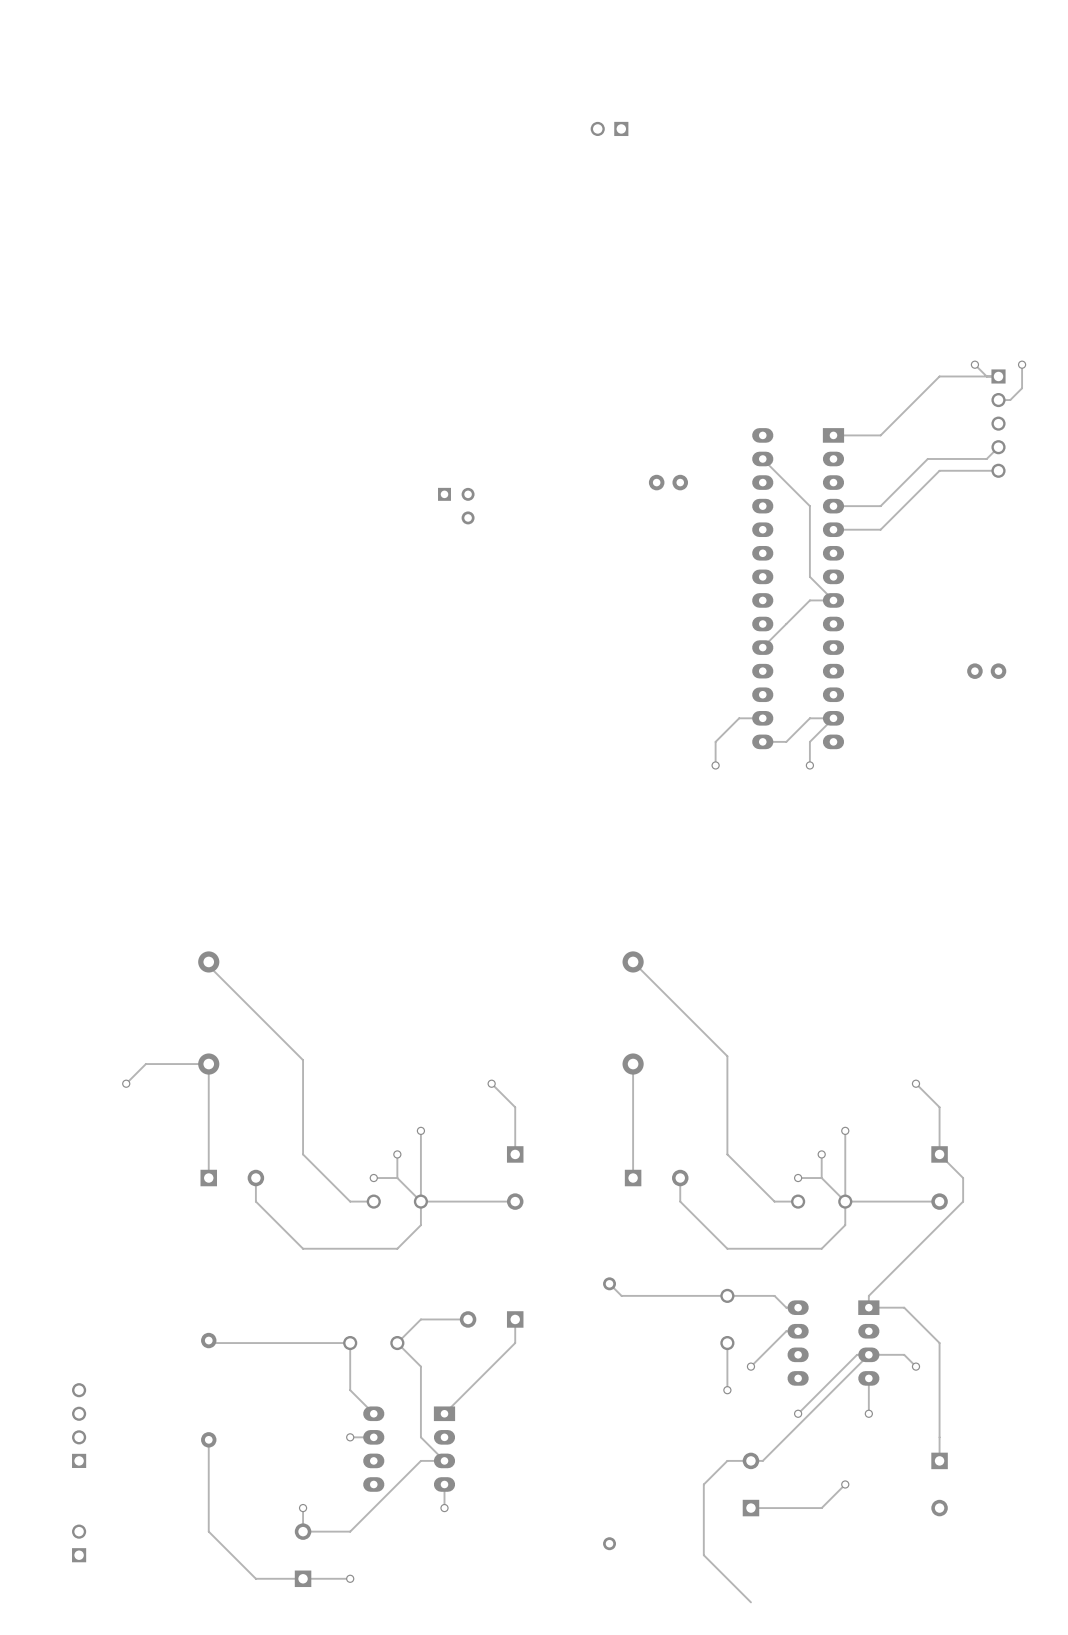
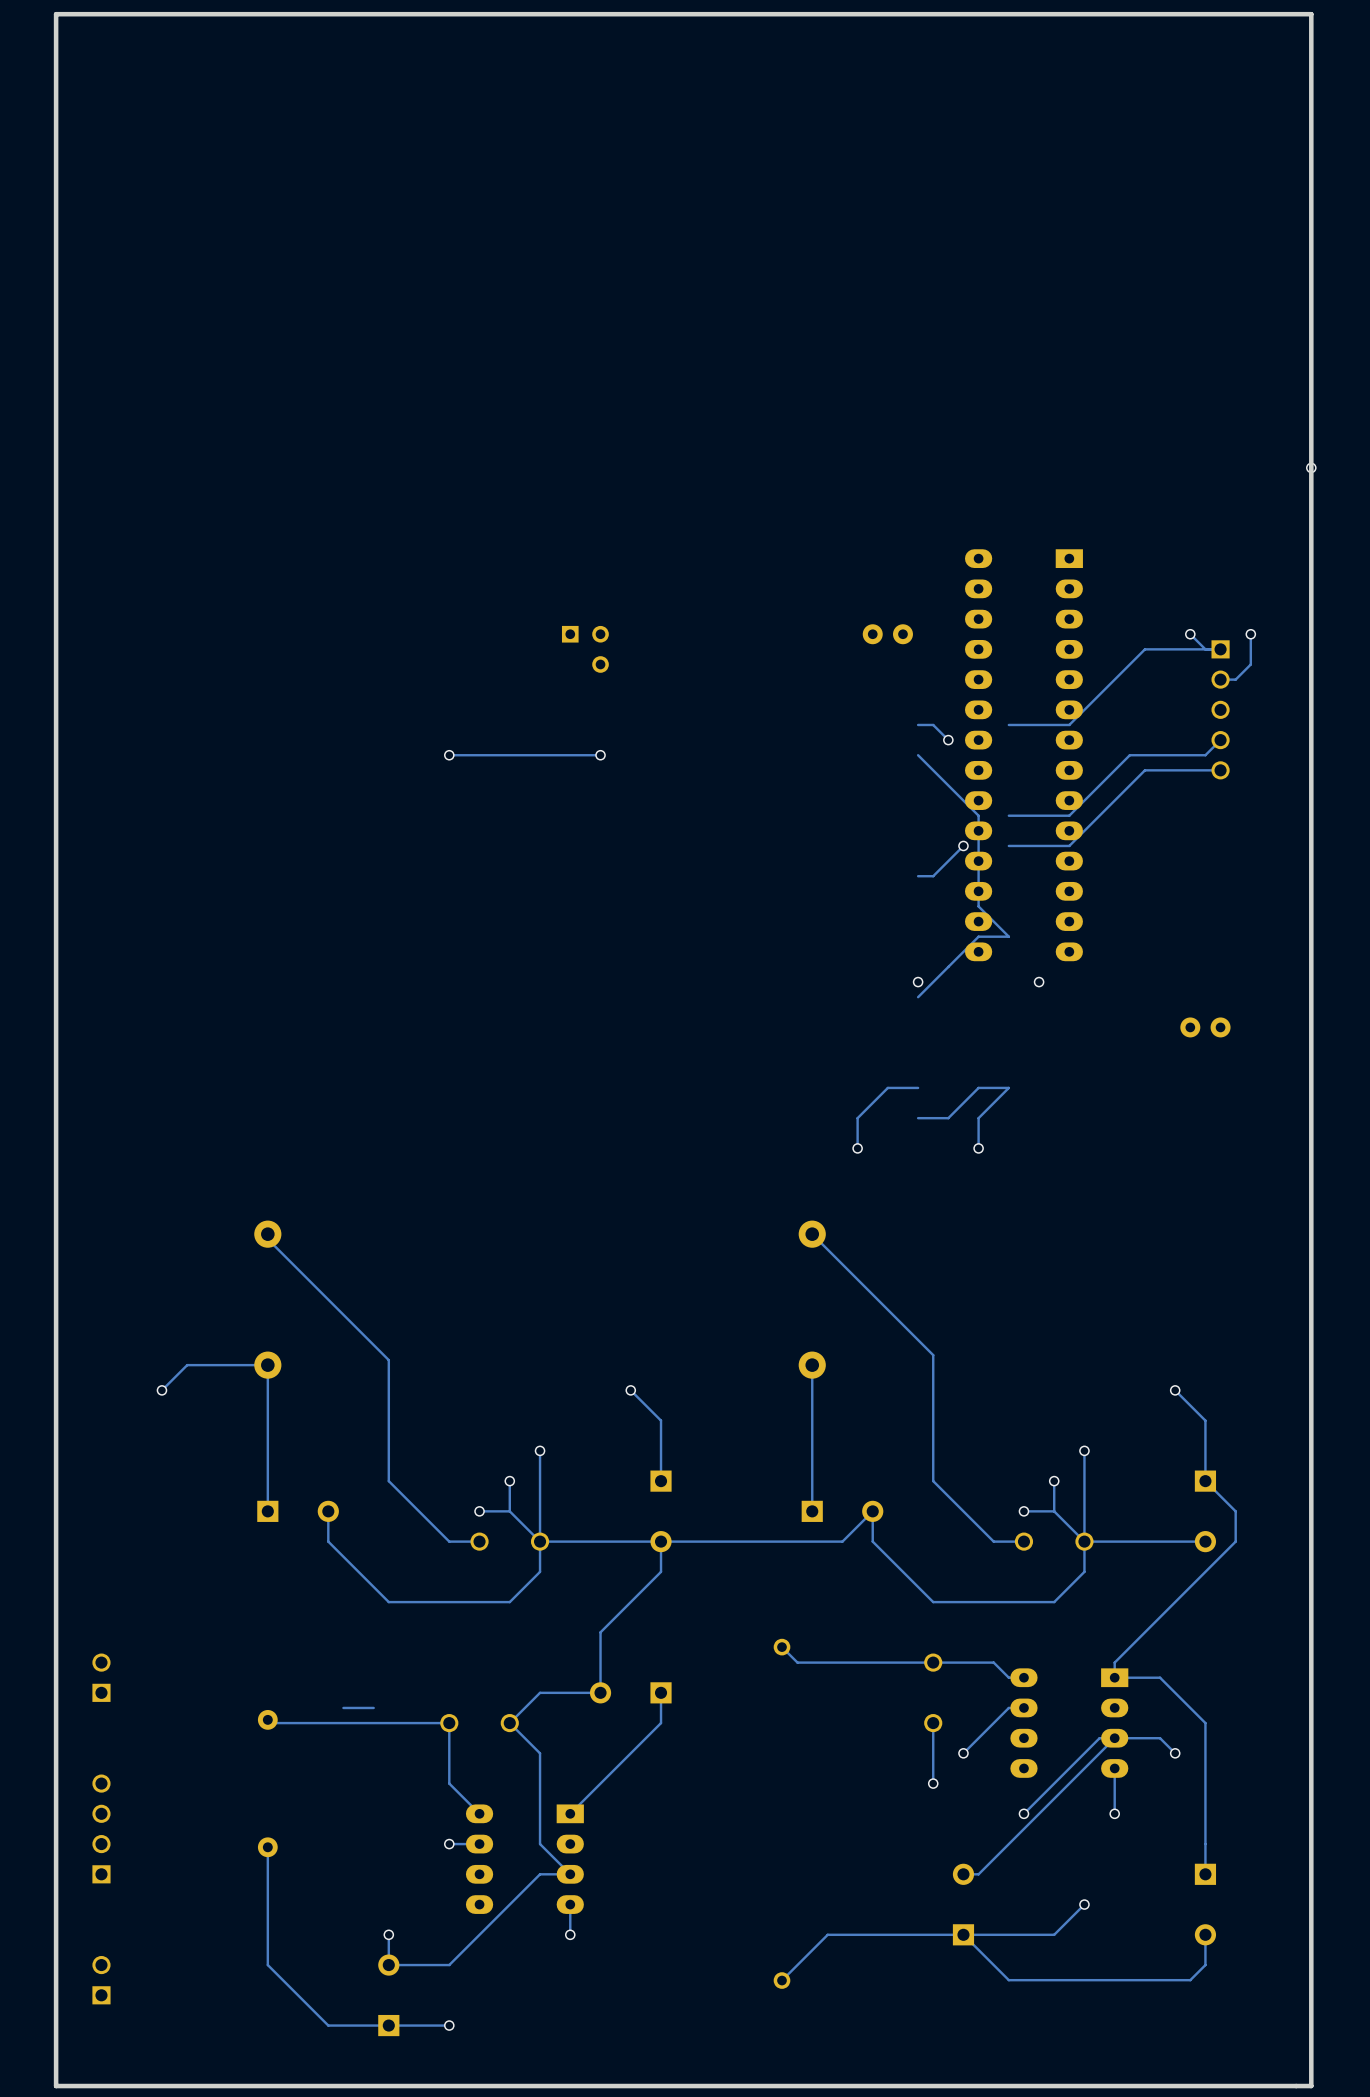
board edge: none -> (1311, 14) (1311, 2086) (56, 2086) (56, 14) (1311, 14)
part: (609, 128) -> none
track: (974, 364) (986, 376) -> (1190, 634) (1205, 649)
via: (974, 364) -> none
track: (1022, 364) (1022, 388) (1010, 400) (998, 400) -> (1250, 634) (1250, 664) (1235, 679) (1220, 679)
track: (998, 376) (939, 376) (880, 435) (833, 435) -> (1220, 649) (1144, 649) (1069, 724) (1008, 724)
part position: (998, 423) -> (1220, 709)
track: (998, 447) (986, 458) (927, 458) (880, 506) (833, 506) -> (1220, 740) (1205, 755) (1129, 755) (1069, 815) (1008, 815)
track: (762, 458) (809, 506) (809, 576) (833, 600) (809, 600) (762, 647) -> (918, 755) (978, 815) (978, 906) (1008, 936) (978, 936) (918, 997)
track: (998, 470) (939, 470) (880, 529) (833, 529) -> (1220, 770) (1144, 770) (1069, 845) (1008, 845)
part position: (668, 482) -> (887, 634)
via: none -> (1190, 634)
via: none -> (1250, 634)
track: none -> (918, 724) (933, 724) (948, 740)
via: none -> (948, 740)
via: none -> (449, 755)
track: none -> (600, 755) (449, 755)
via: none -> (600, 755)
track: none -> (963, 845) (933, 876) (918, 876)
via: none -> (963, 845)
part position: (986, 671) -> (1205, 1027)
track: (762, 718) (739, 718) (715, 741) (715, 765) -> (918, 1087) (887, 1087) (857, 1118) (857, 1148)
track: (762, 741) (786, 741) (809, 718) (833, 718) (809, 741) (809, 765) -> (918, 1118) (948, 1118) (978, 1087) (1008, 1087) (978, 1118) (978, 1148)
via: none -> (857, 1148)
via: none -> (978, 1148)
track: none -> (872, 1511) (842, 1541) (661, 1541) (661, 1571) (600, 1632) (600, 1692)
part: none -> (101, 1677)
track: none -> (373, 1707) (343, 1707)
track: (750, 1460) (727, 1460) (703, 1484) (703, 1555) (750, 1602) -> none
track: none -> (1205, 1934) (1205, 1965) (1190, 1980) (1008, 1980) (963, 1934) (827, 1934) (782, 1980)

